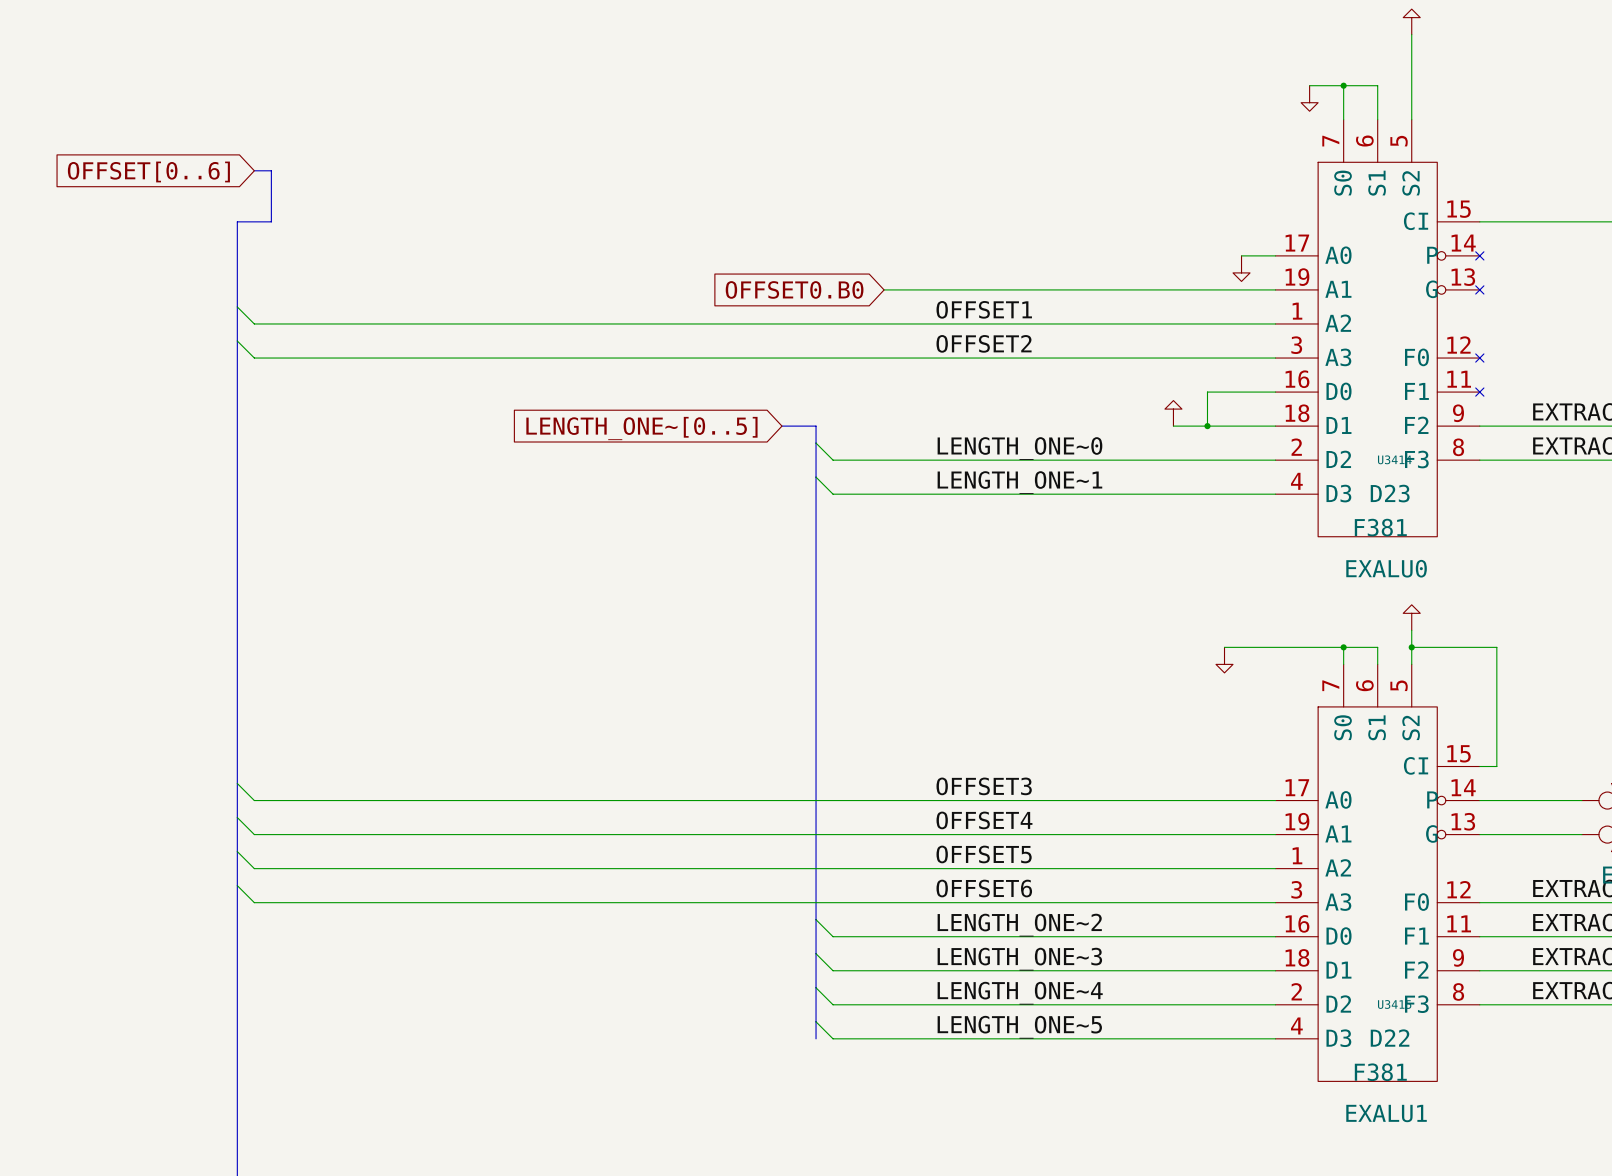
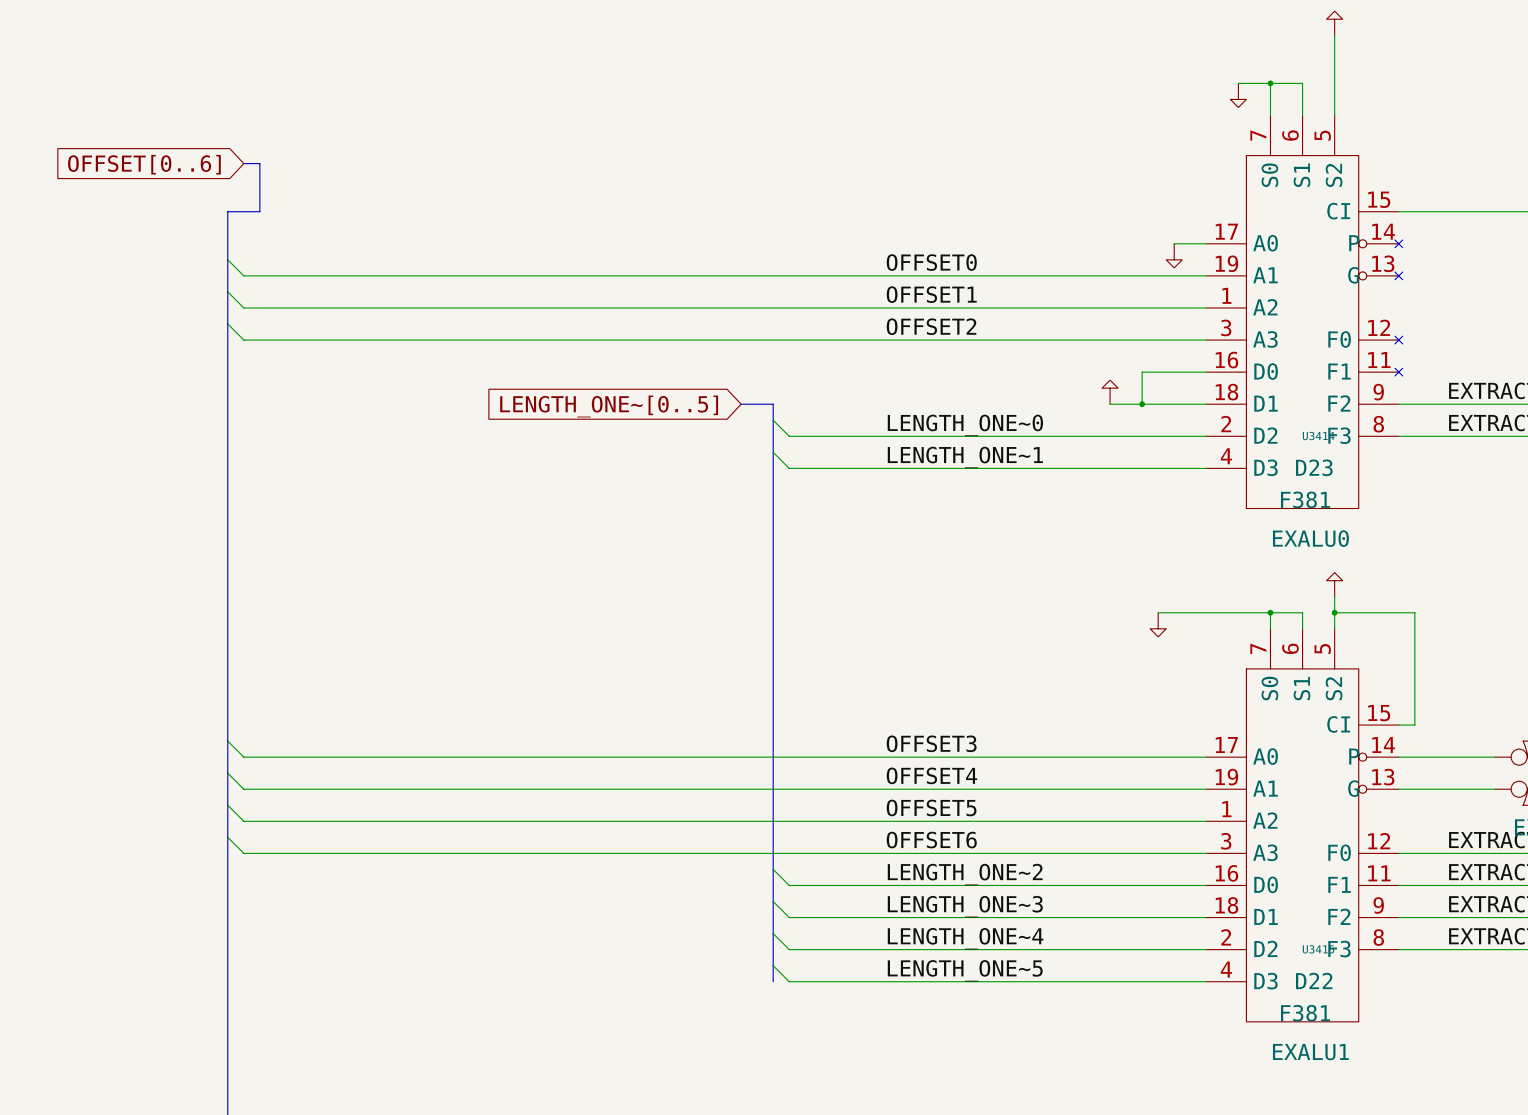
wire: none -> (227, 259) (243, 275) (837, 275)
label: none -> OFFSET0 (931, 262)
global label: OFFSET0.B0 (794, 289) -> none

